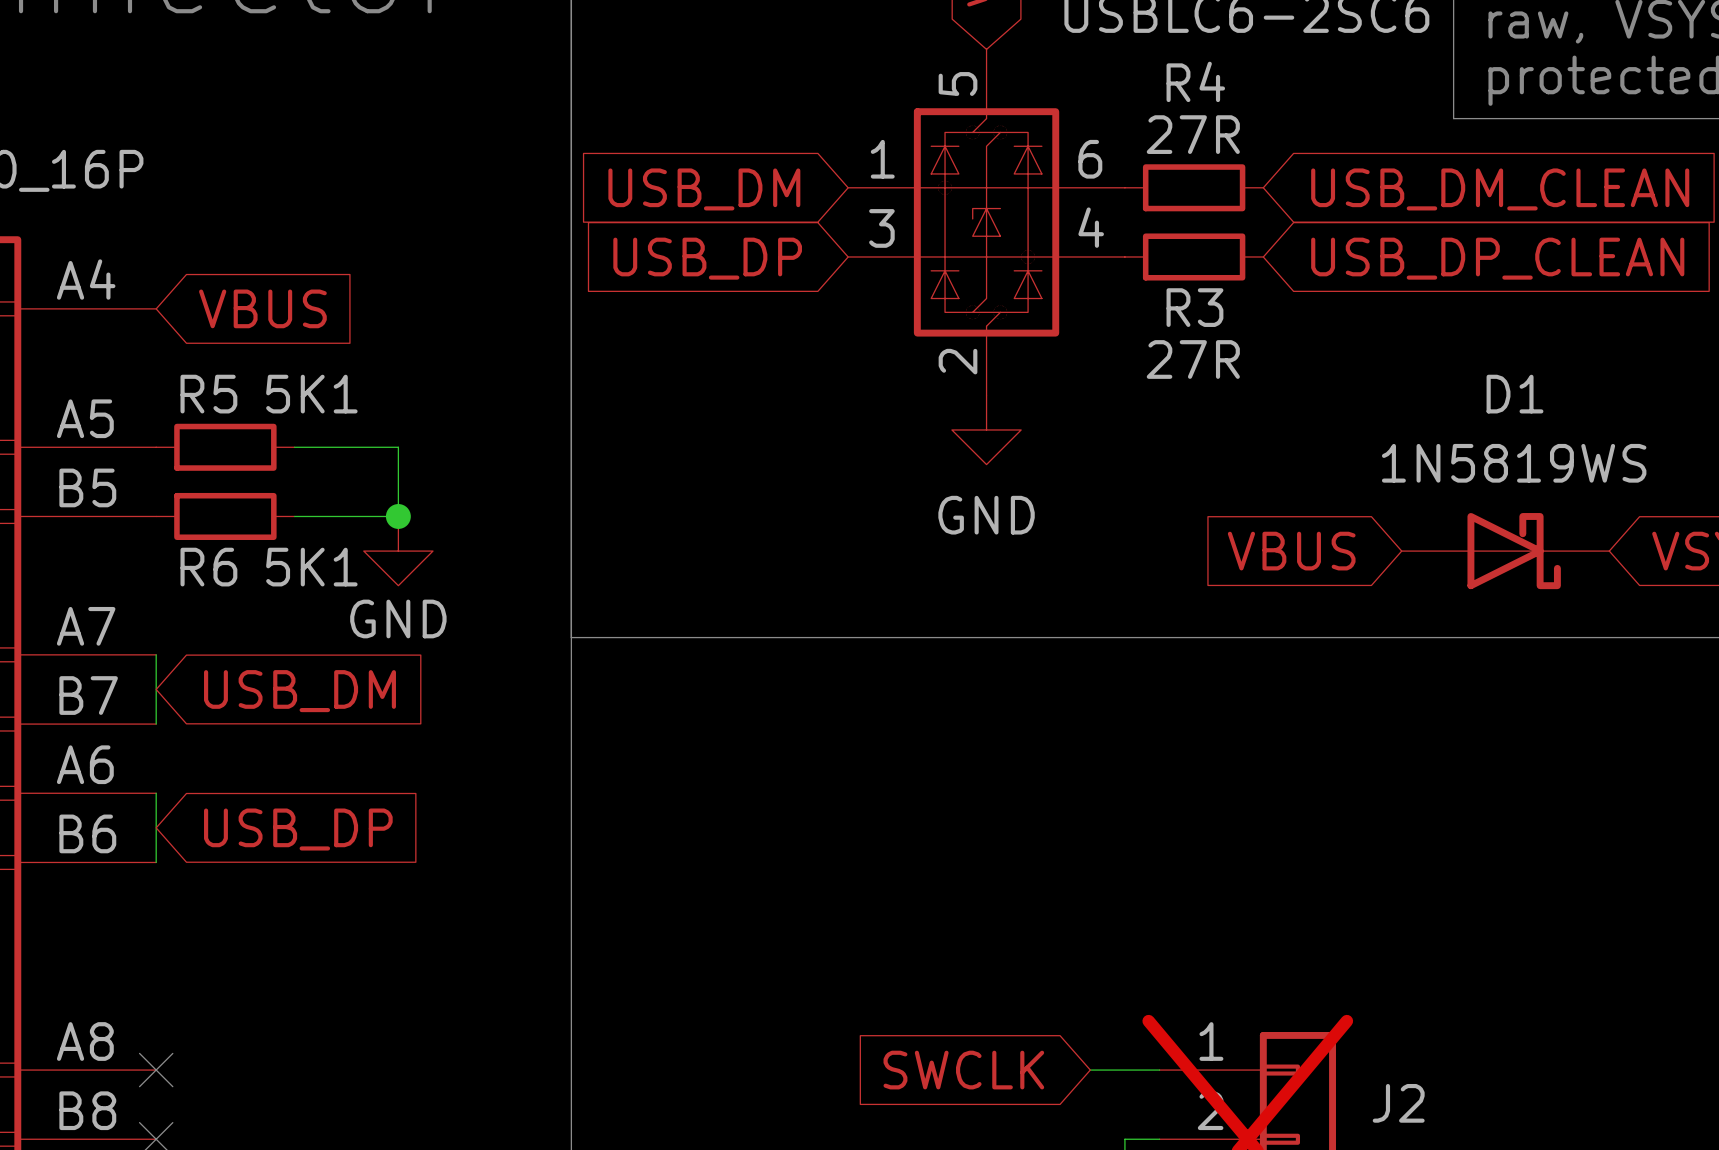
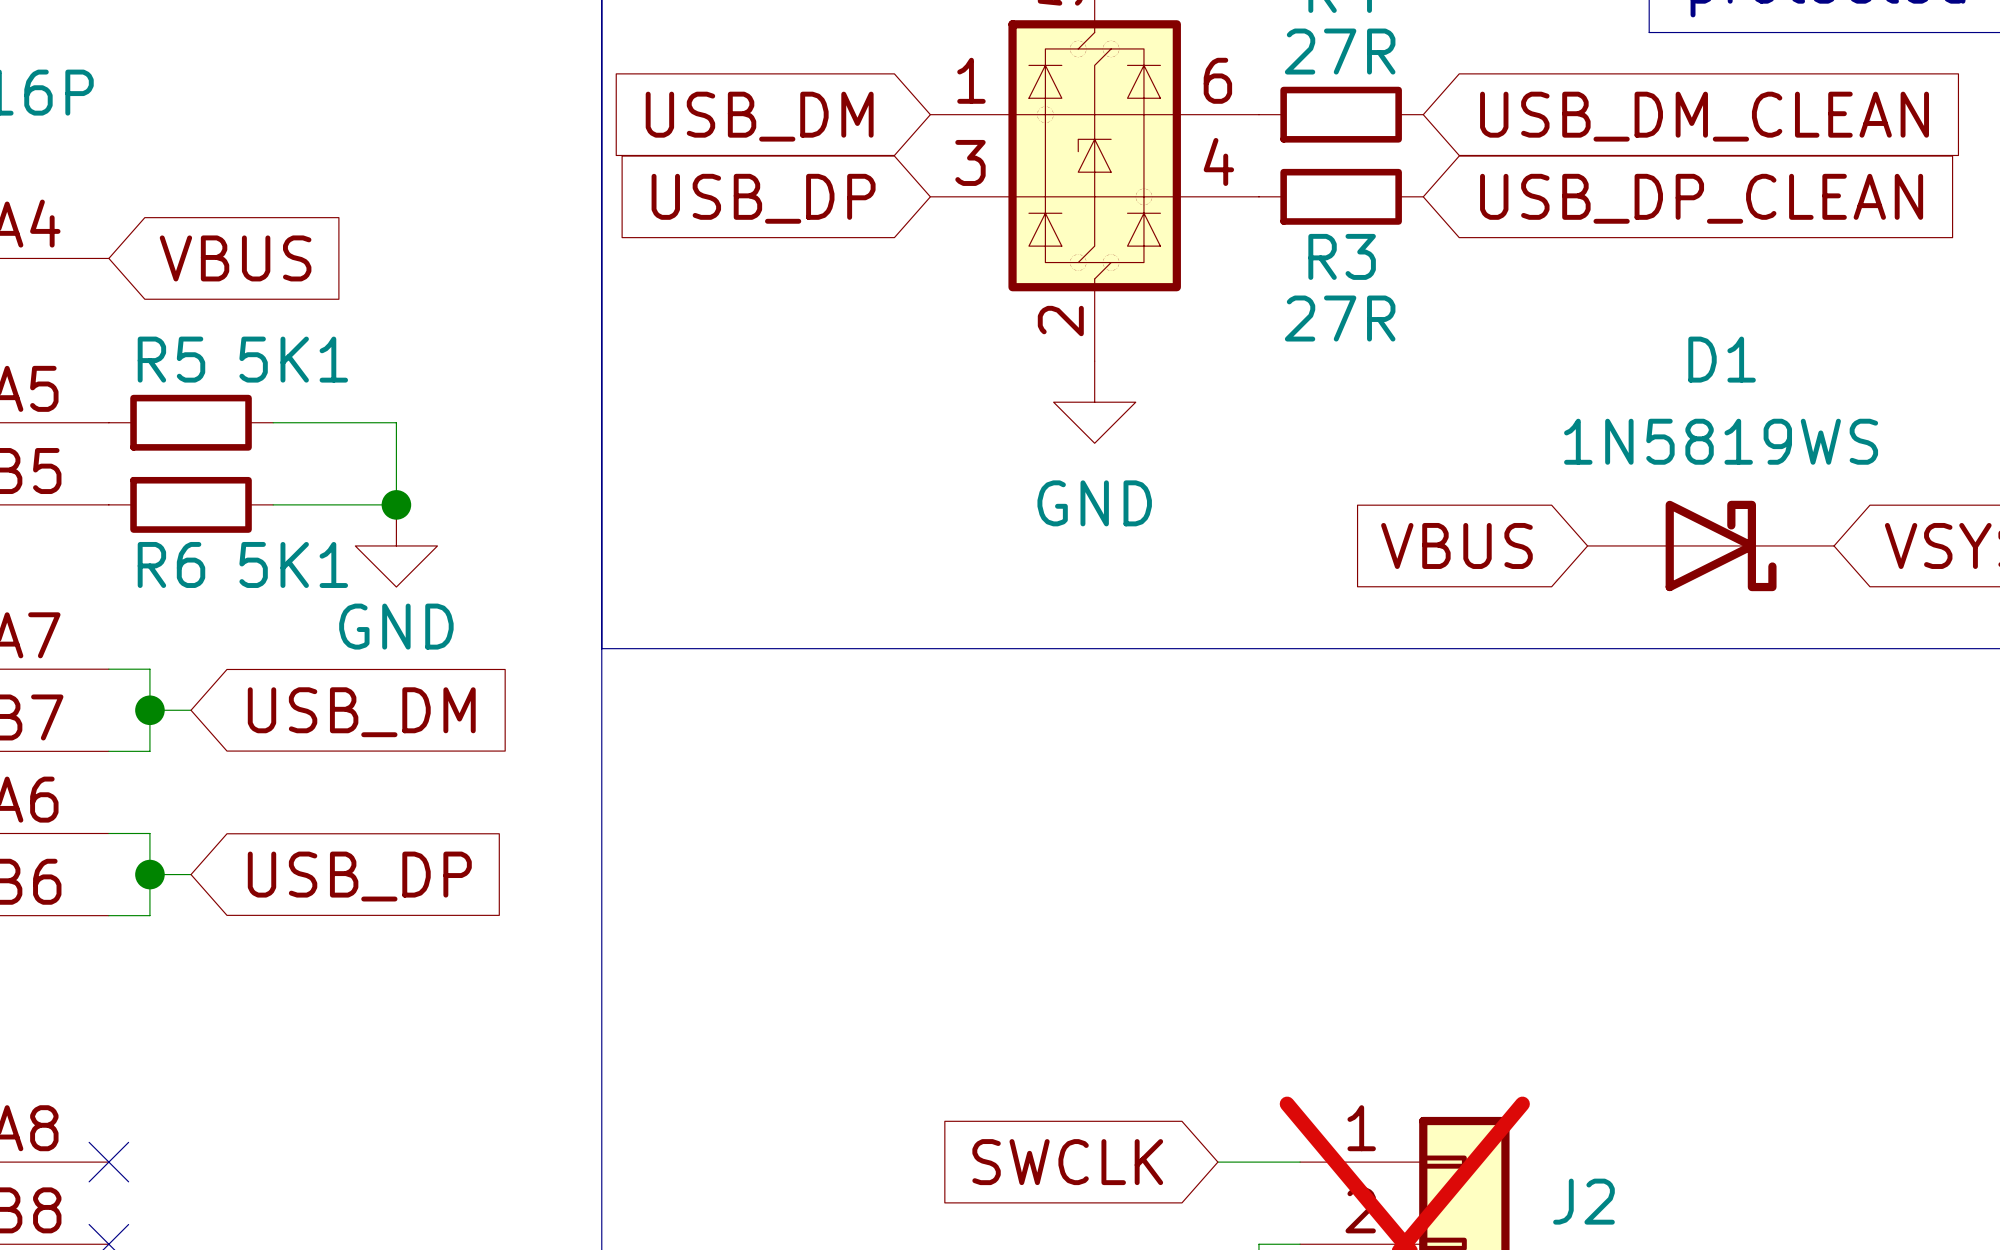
wire: (156, 654) (156, 724) -> (108, 669) (149, 669) (149, 751) (108, 751)
wire: none -> (149, 710) (191, 710)
junction: none -> (149, 710)
global label position: USB_DM (299, 691) -> USB_DM (361, 712)
wire: (156, 793) (156, 862) -> (108, 833) (149, 833) (149, 915) (108, 915)
wire: none -> (149, 874) (191, 874)
junction: none -> (149, 874)
global label position: USB_DP (298, 829) -> USB_DP (359, 876)

